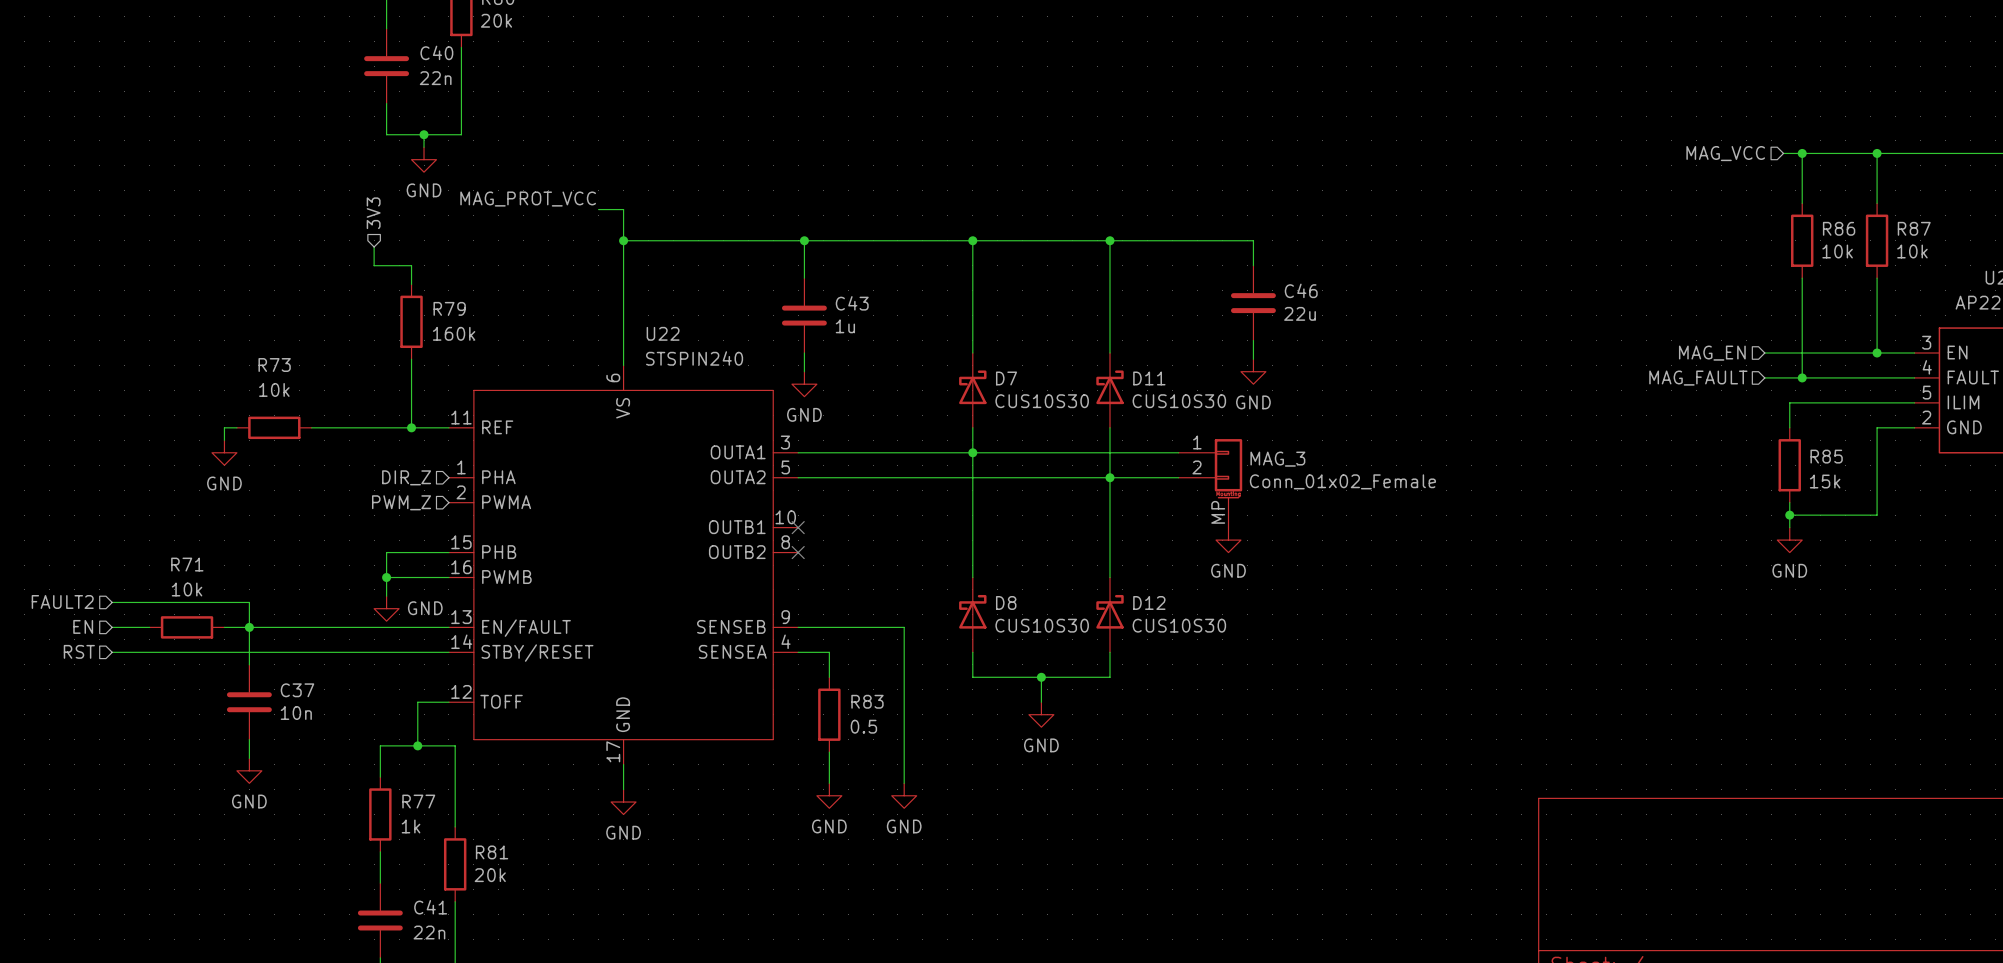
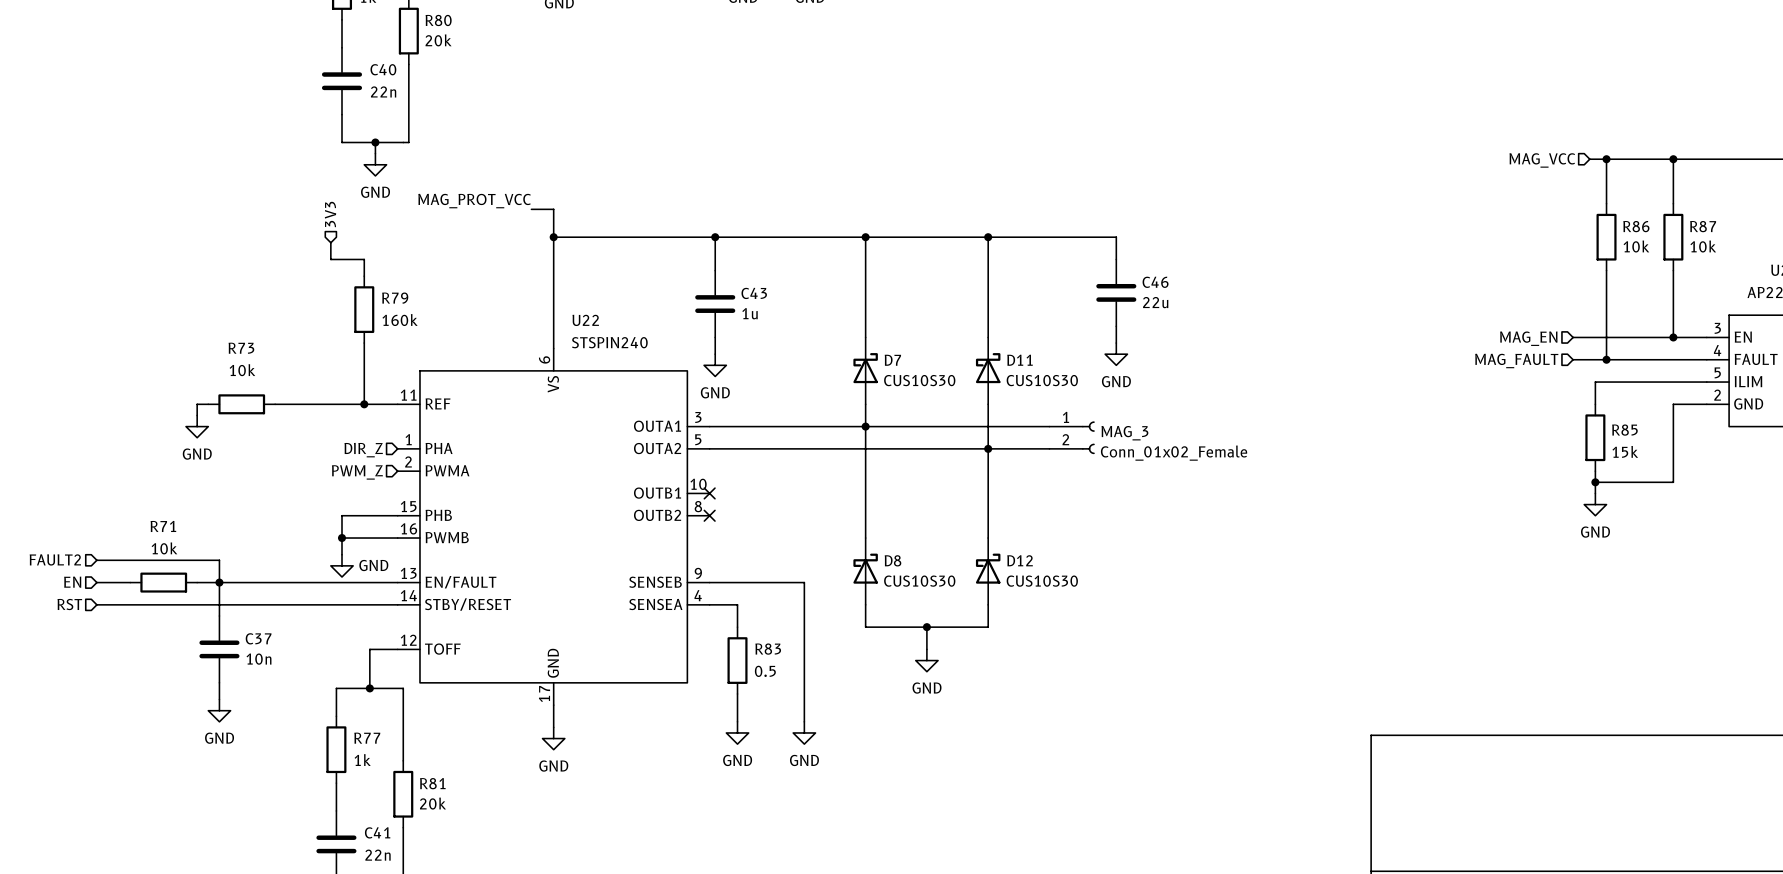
MAG_3 symbol: [1178, 439, 1243, 528] -> [1049, 421, 1095, 455]
power symbol: GND (1228, 540) -> none

